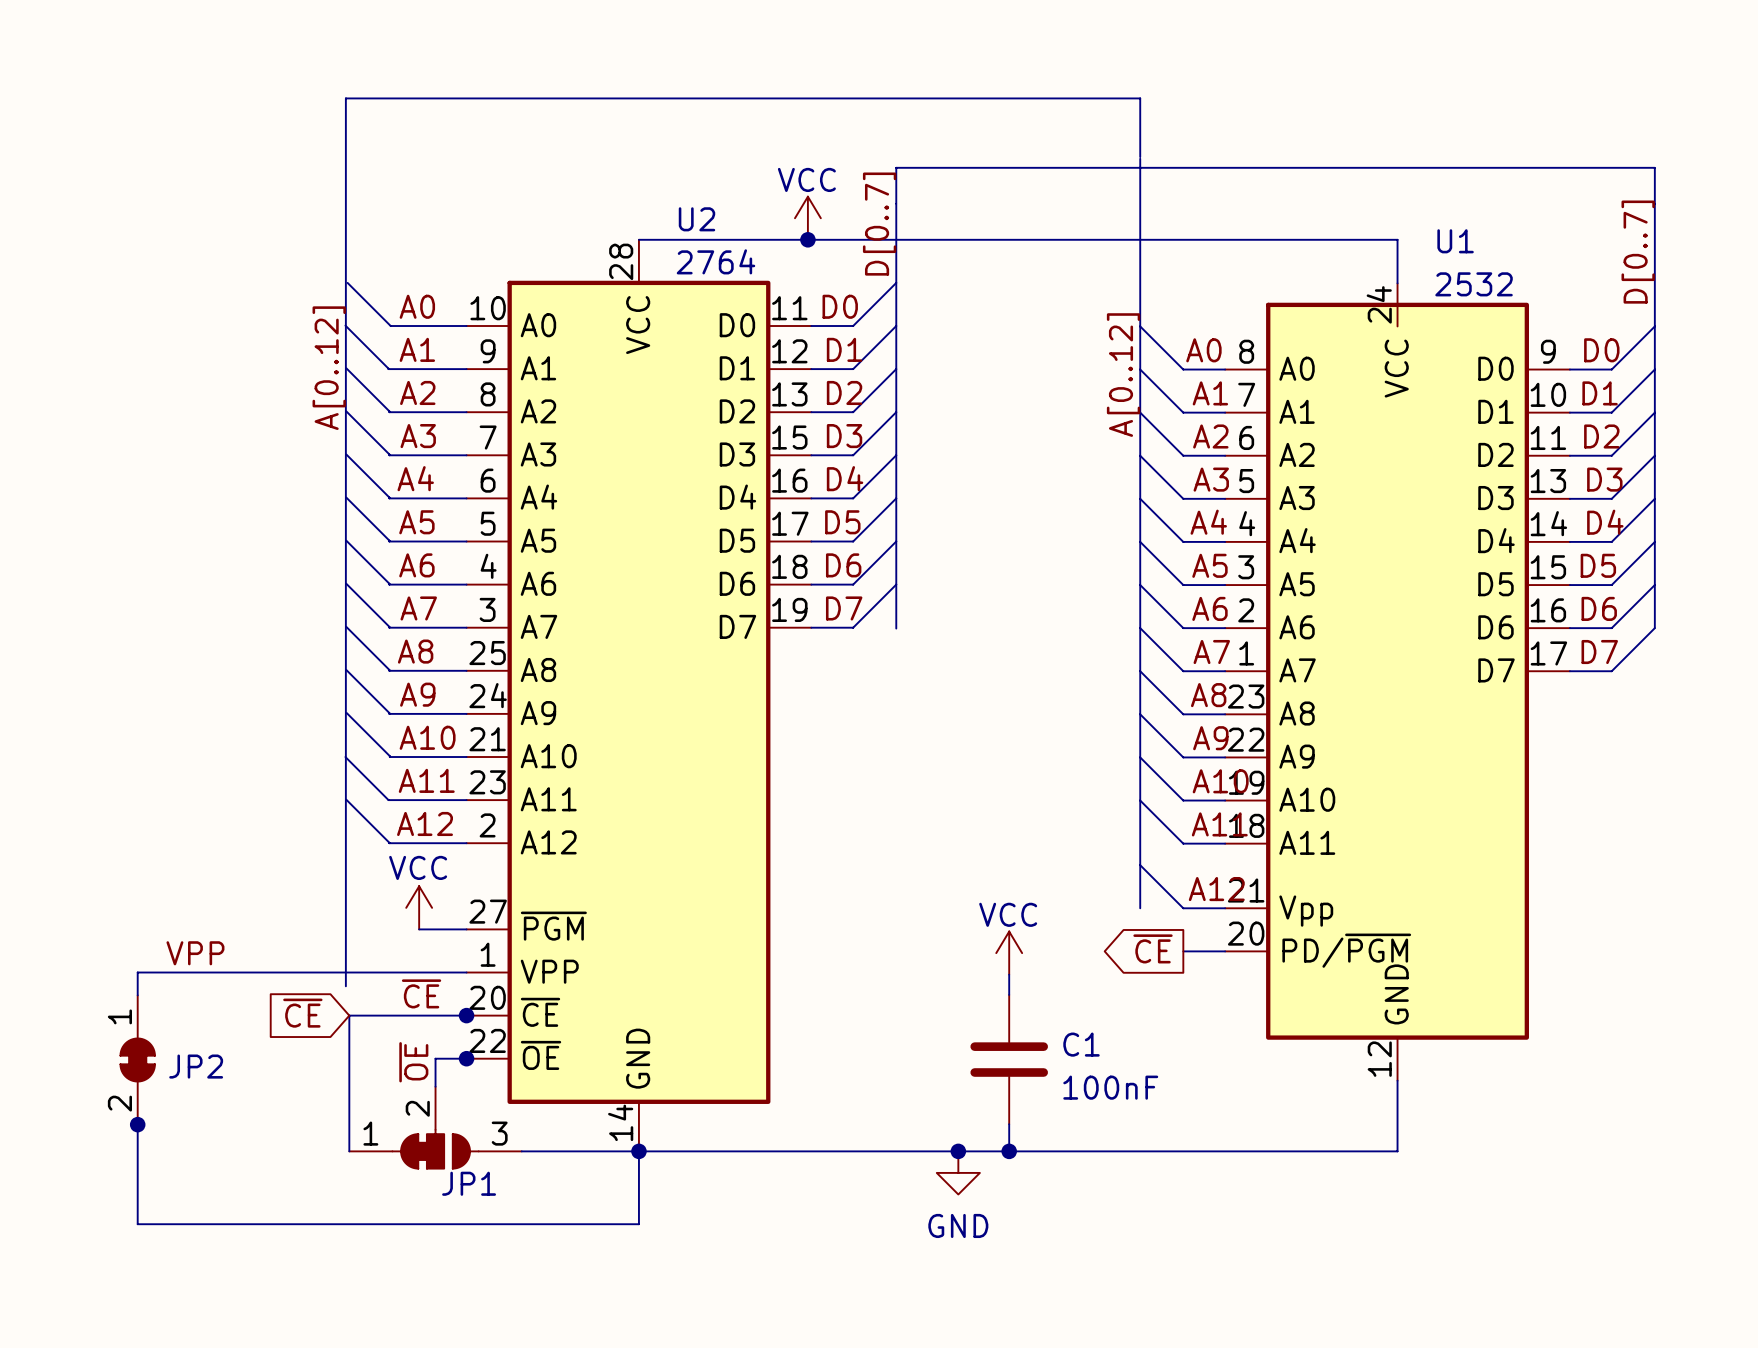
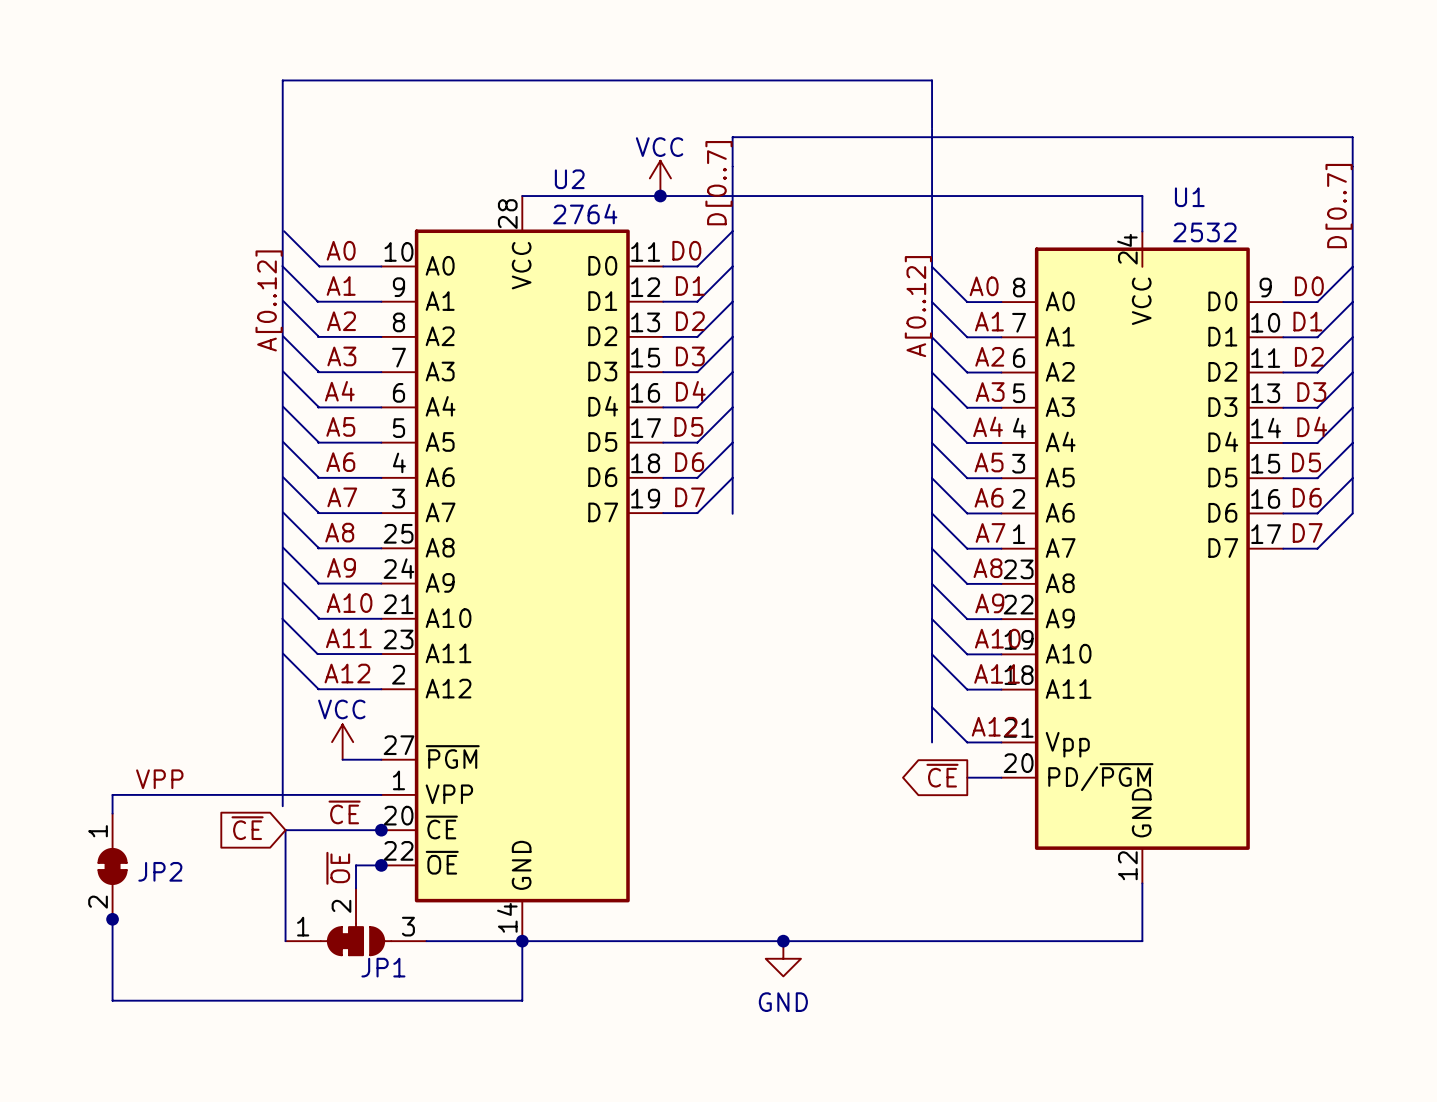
power symbol: VCC (1009, 953) -> none
wire: (1009, 974) (1009, 994) -> none
C1: 100nF (1009, 1059) -> none
wire: (1009, 1124) (1009, 1151) -> none
junction: (1009, 1151) -> none

